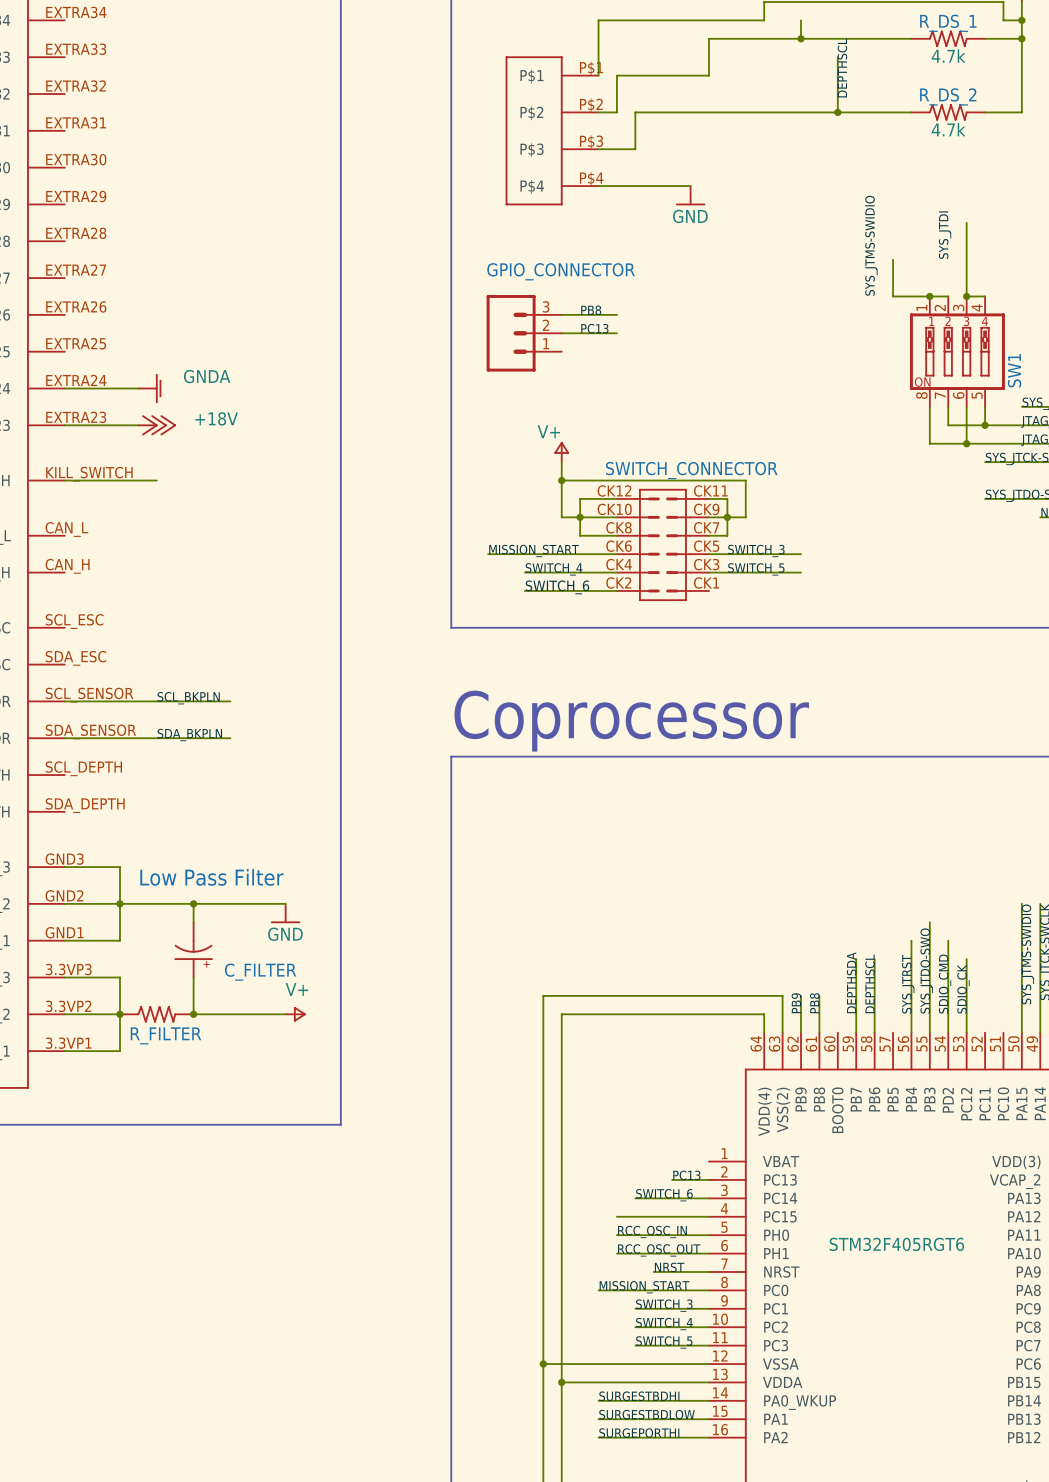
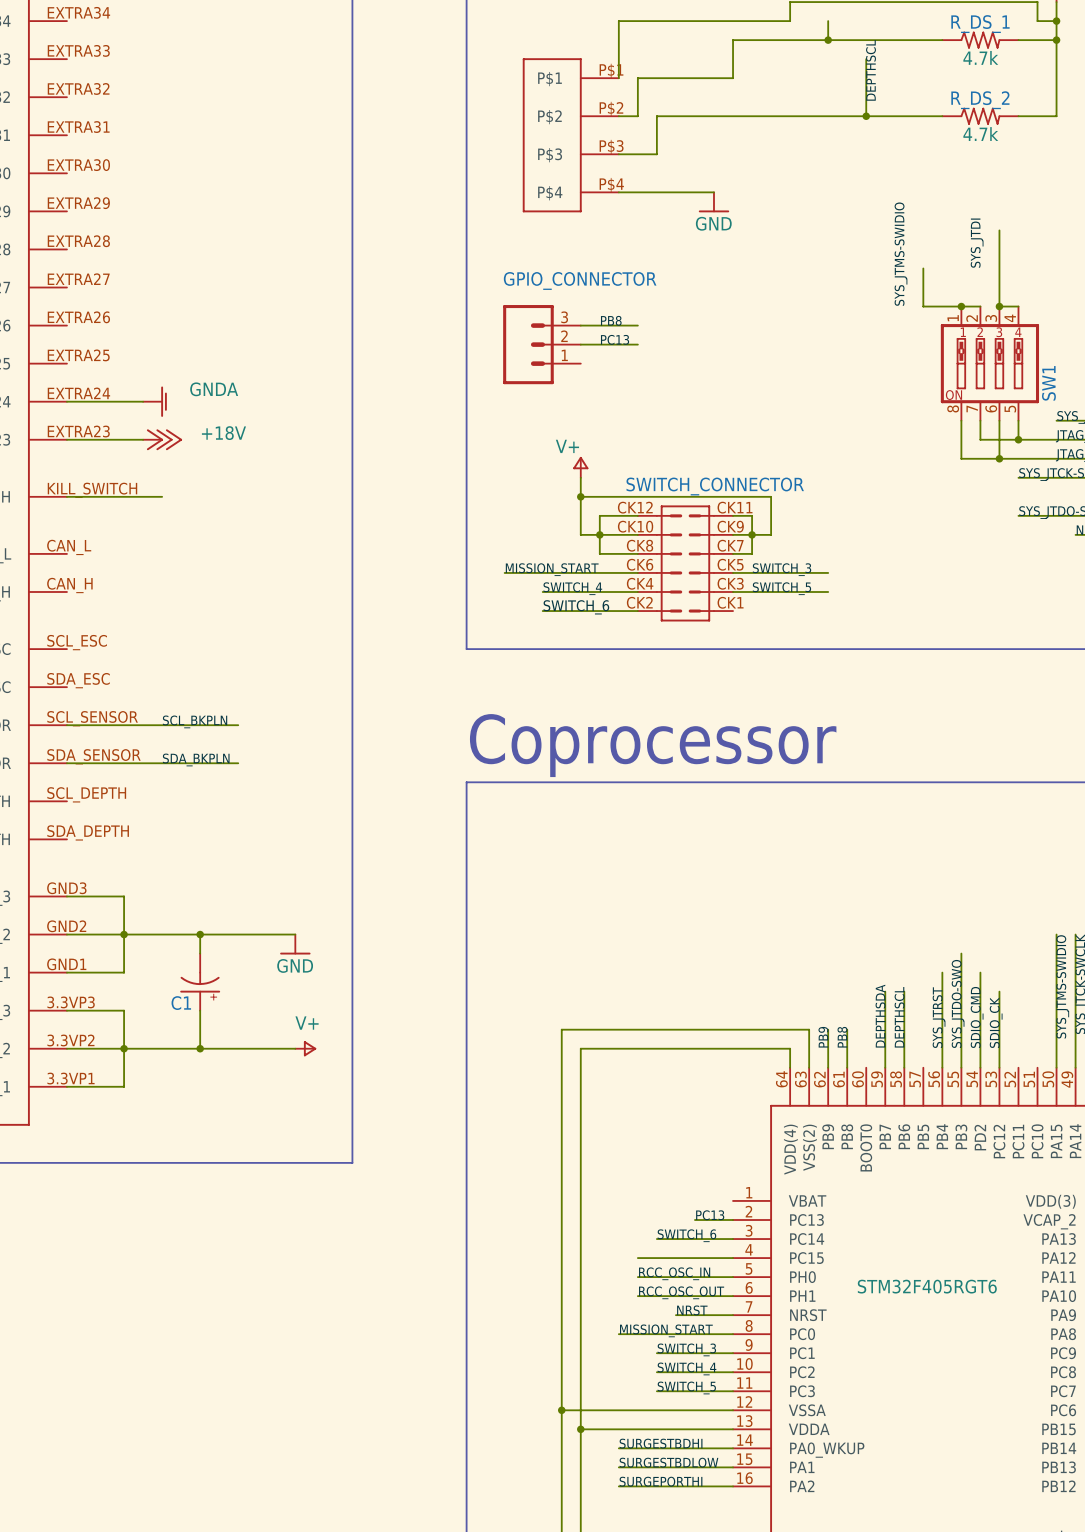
text: Low Pass Filter (211, 877) -> none
C_FILTER name: C_FILTER (260, 972) -> C1 (181, 1003)
R_FILTER: (156, 1014) -> none

